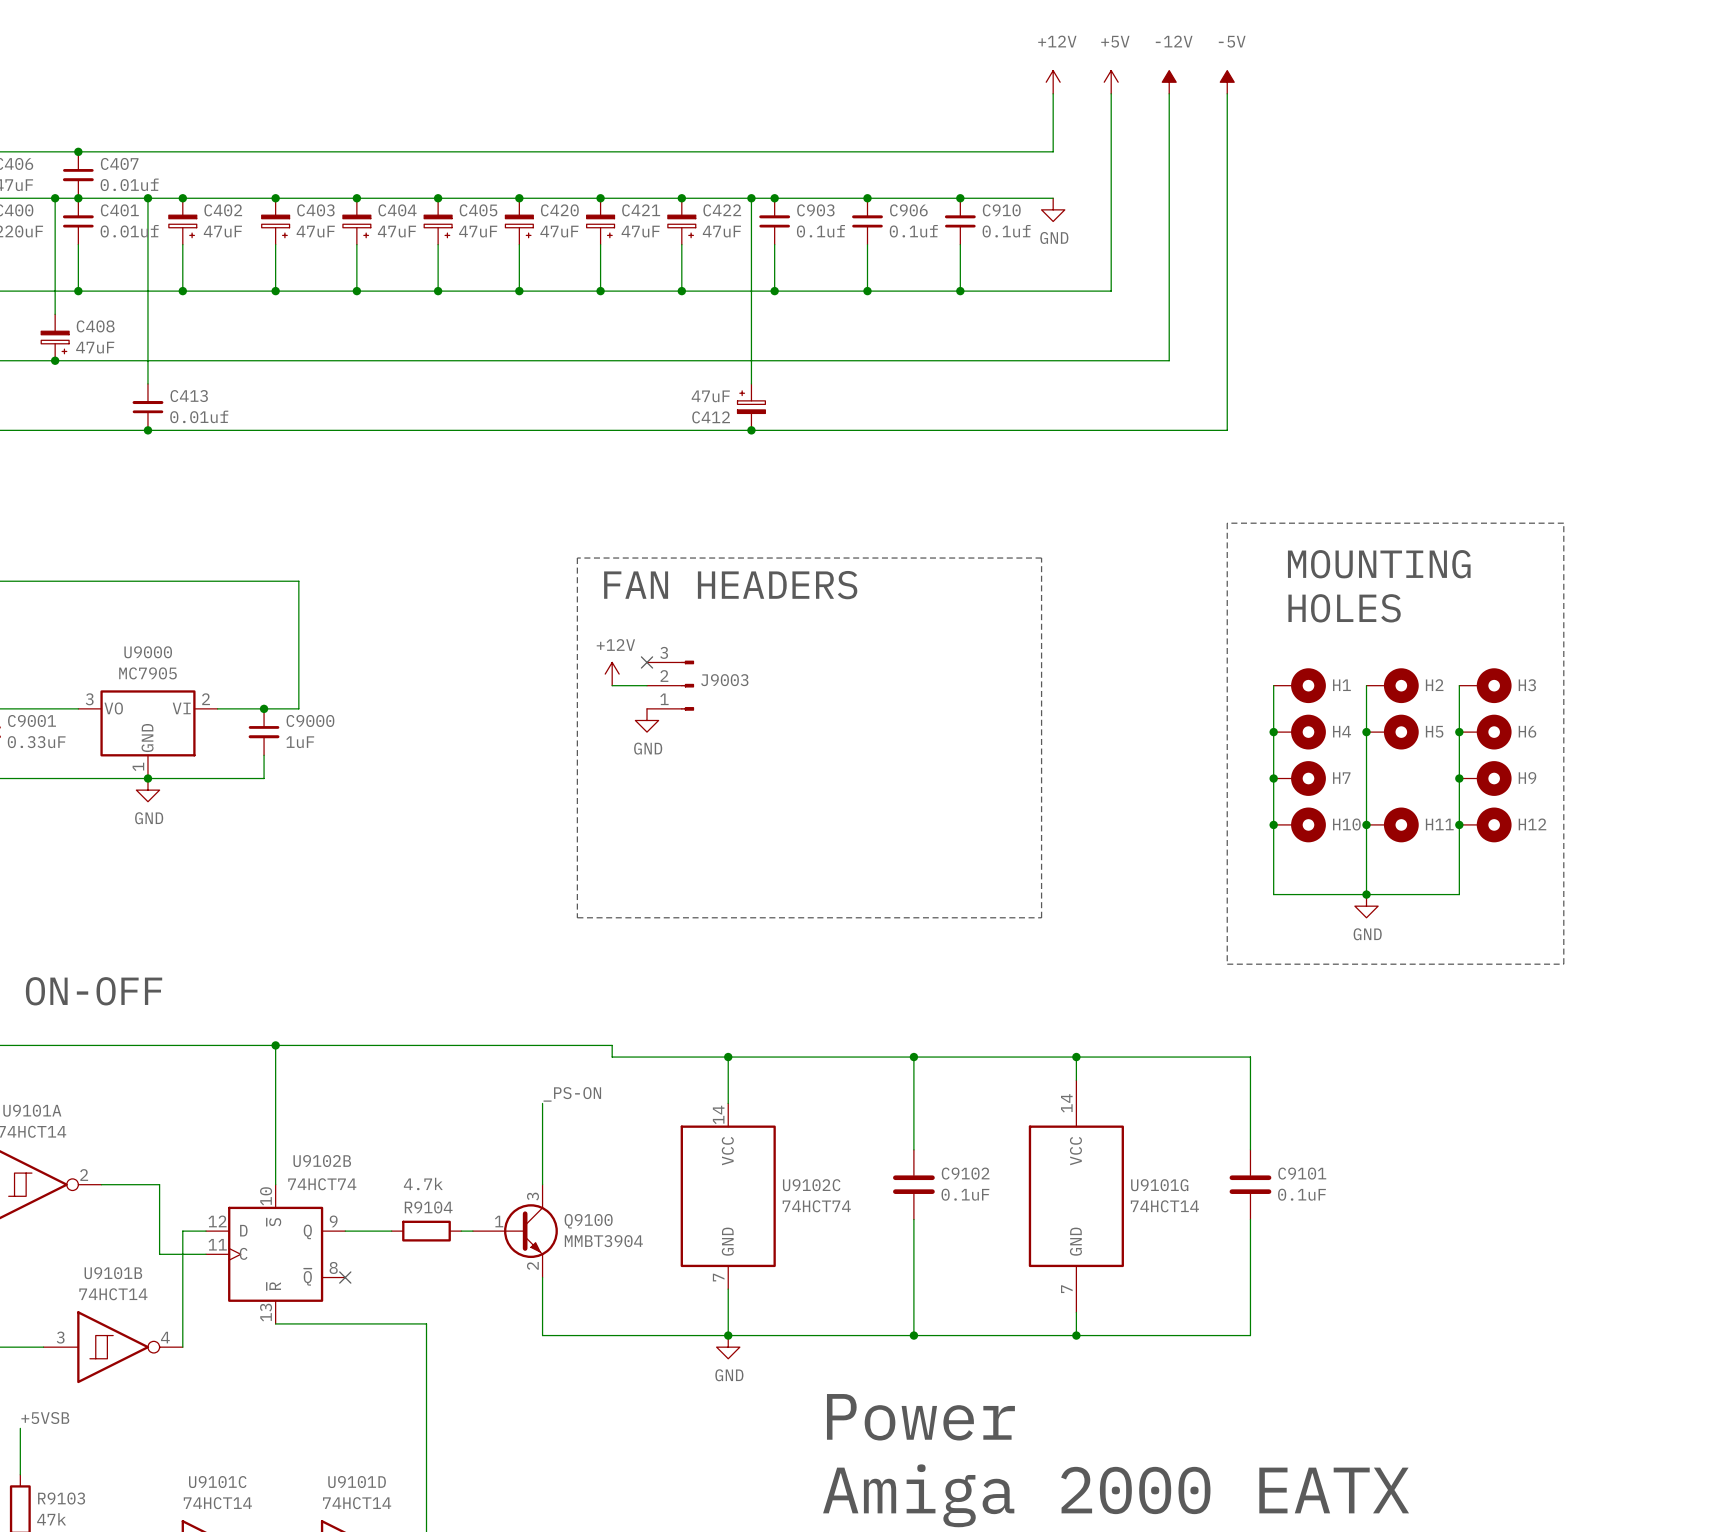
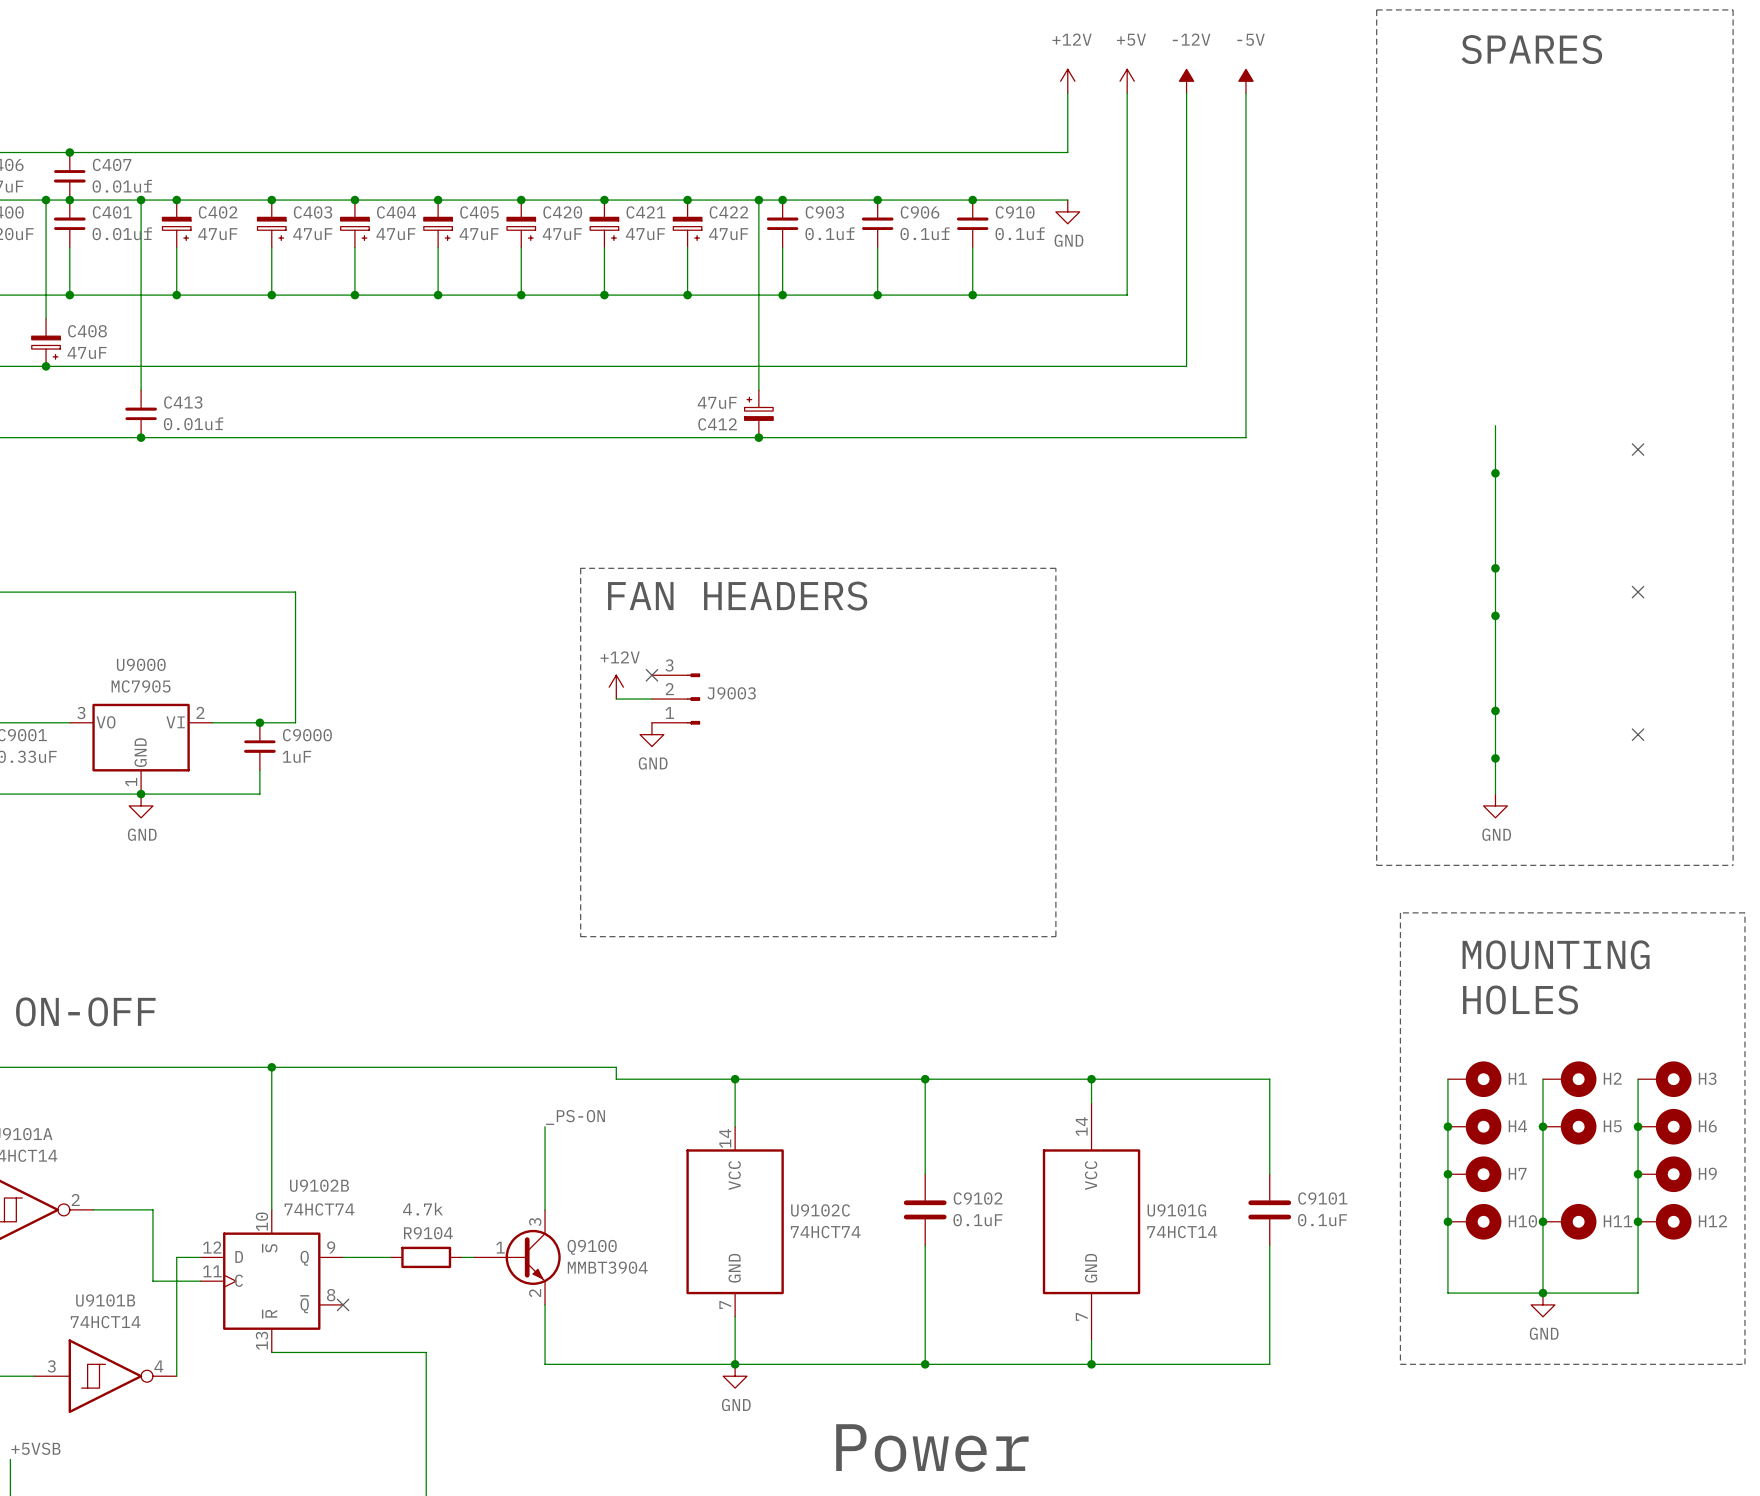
line: none -> (1376, 9) (1376, 865) (1733, 865) (1733, 9) (1376, 9)
text: none -> SPARES (1531, 49)
wire: none -> (1495, 425) (1495, 794)
no-connect mark: none -> (1638, 449)
junction: none -> (1495, 473)
line: (1227, 523) (1227, 964) (1563, 964) (1563, 523) (1227, 523) -> none
junction: none -> (1495, 568)
text: MOUNTING (1379, 564) -> none
no-connect mark: none -> (1638, 592)
junction: none -> (1495, 615)
text: HOLES (1344, 608) -> none
wire: (1273, 685) (1273, 894) (1459, 894) (1459, 685) -> none
H1 position: (1299, 685) -> (1474, 1079)
wire: (1366, 685) (1366, 894) -> none
H2 position: (1392, 685) -> (1569, 1079)
H3 position: (1485, 685) -> (1664, 1079)
junction: none -> (1495, 710)
no-connect mark: none -> (1638, 734)
junction: (1273, 732) -> none
H4 position: (1299, 732) -> (1474, 1126)
junction: (1366, 732) -> none
H5 position: (1392, 732) -> (1569, 1126)
junction position: (1459, 732) -> (1495, 758)
H6 position: (1485, 732) -> (1664, 1126)
junction: (1273, 778) -> none
H7 position: (1299, 778) -> (1474, 1174)
junction: (1459, 778) -> none
H9 position: (1485, 778) -> (1664, 1174)
junction: (1273, 824) -> none
H10 position: (1299, 824) -> (1474, 1221)
junction: (1366, 824) -> none
H11 position: (1392, 824) -> (1569, 1221)
junction: (1459, 824) -> none
H12 position: (1485, 824) -> (1664, 1221)
junction: (1366, 894) -> none
line: none -> (1400, 912) (1400, 1364) (1744, 1364) (1744, 912) (1400, 912)
power symbol position: GND (1366, 906) -> GND (1495, 805)
text: none -> MOUNTING (1556, 954)
text: none -> HOLES (1520, 1000)
wire: none -> (1447, 1079) (1447, 1293) (1638, 1293) (1638, 1079)
wire: none -> (1543, 1079) (1543, 1293)
junction: none -> (1447, 1126)
junction: none -> (1543, 1126)
junction: none -> (1638, 1126)
junction: none -> (1447, 1174)
junction: none -> (1638, 1174)
junction: none -> (1447, 1221)
junction: none -> (1543, 1221)
junction: none -> (1638, 1221)
junction: none -> (1543, 1293)
power symbol: none -> GND (1543, 1304)

